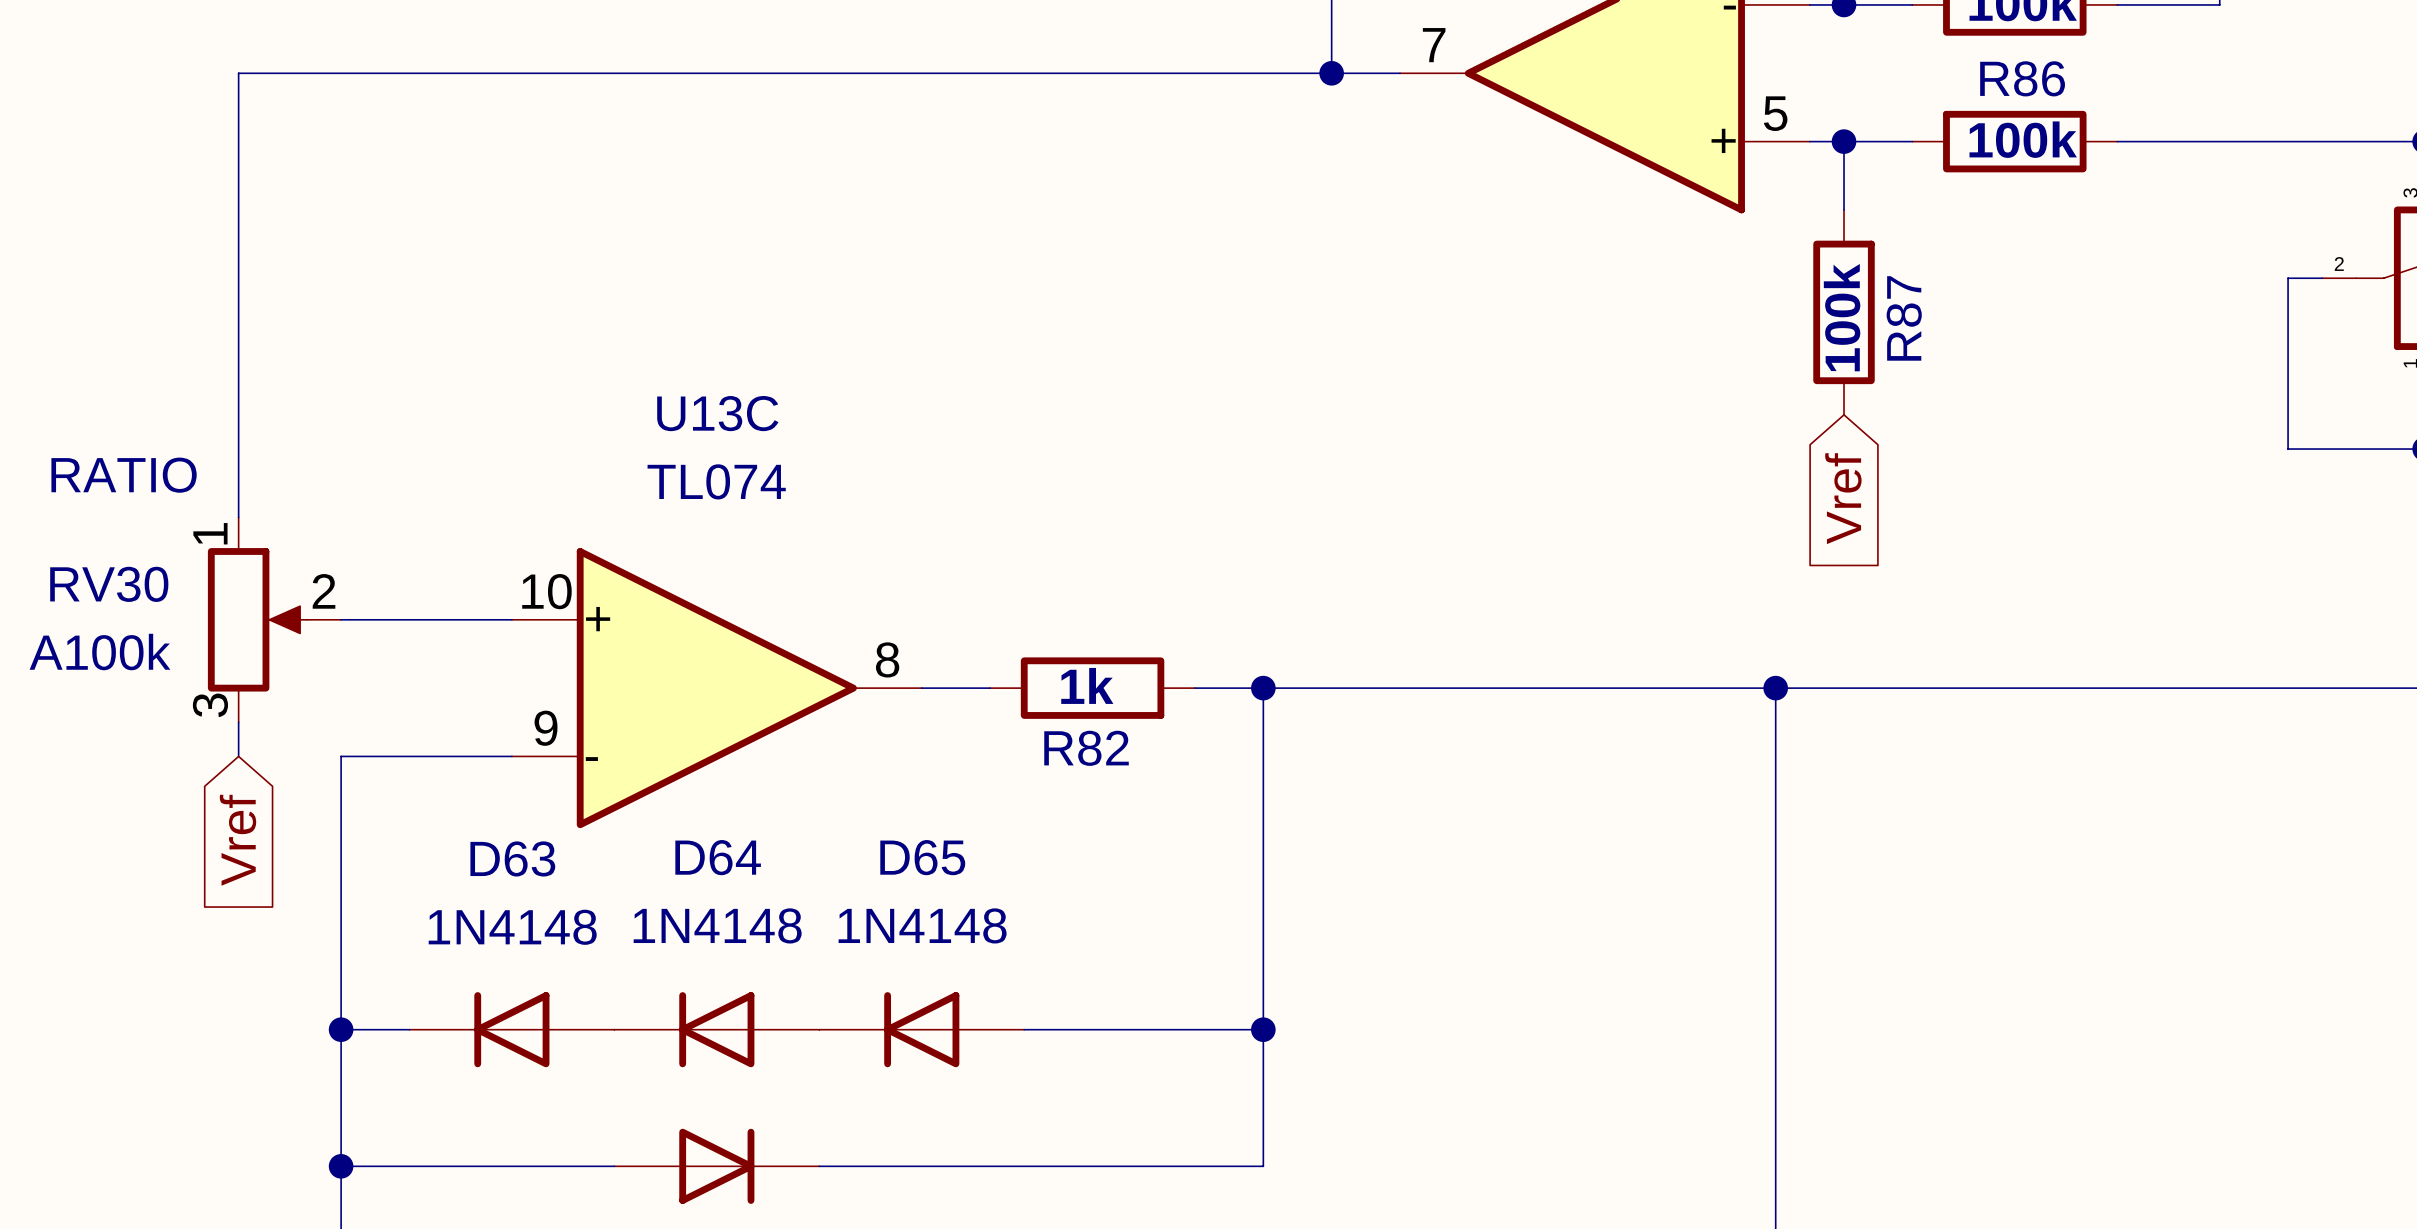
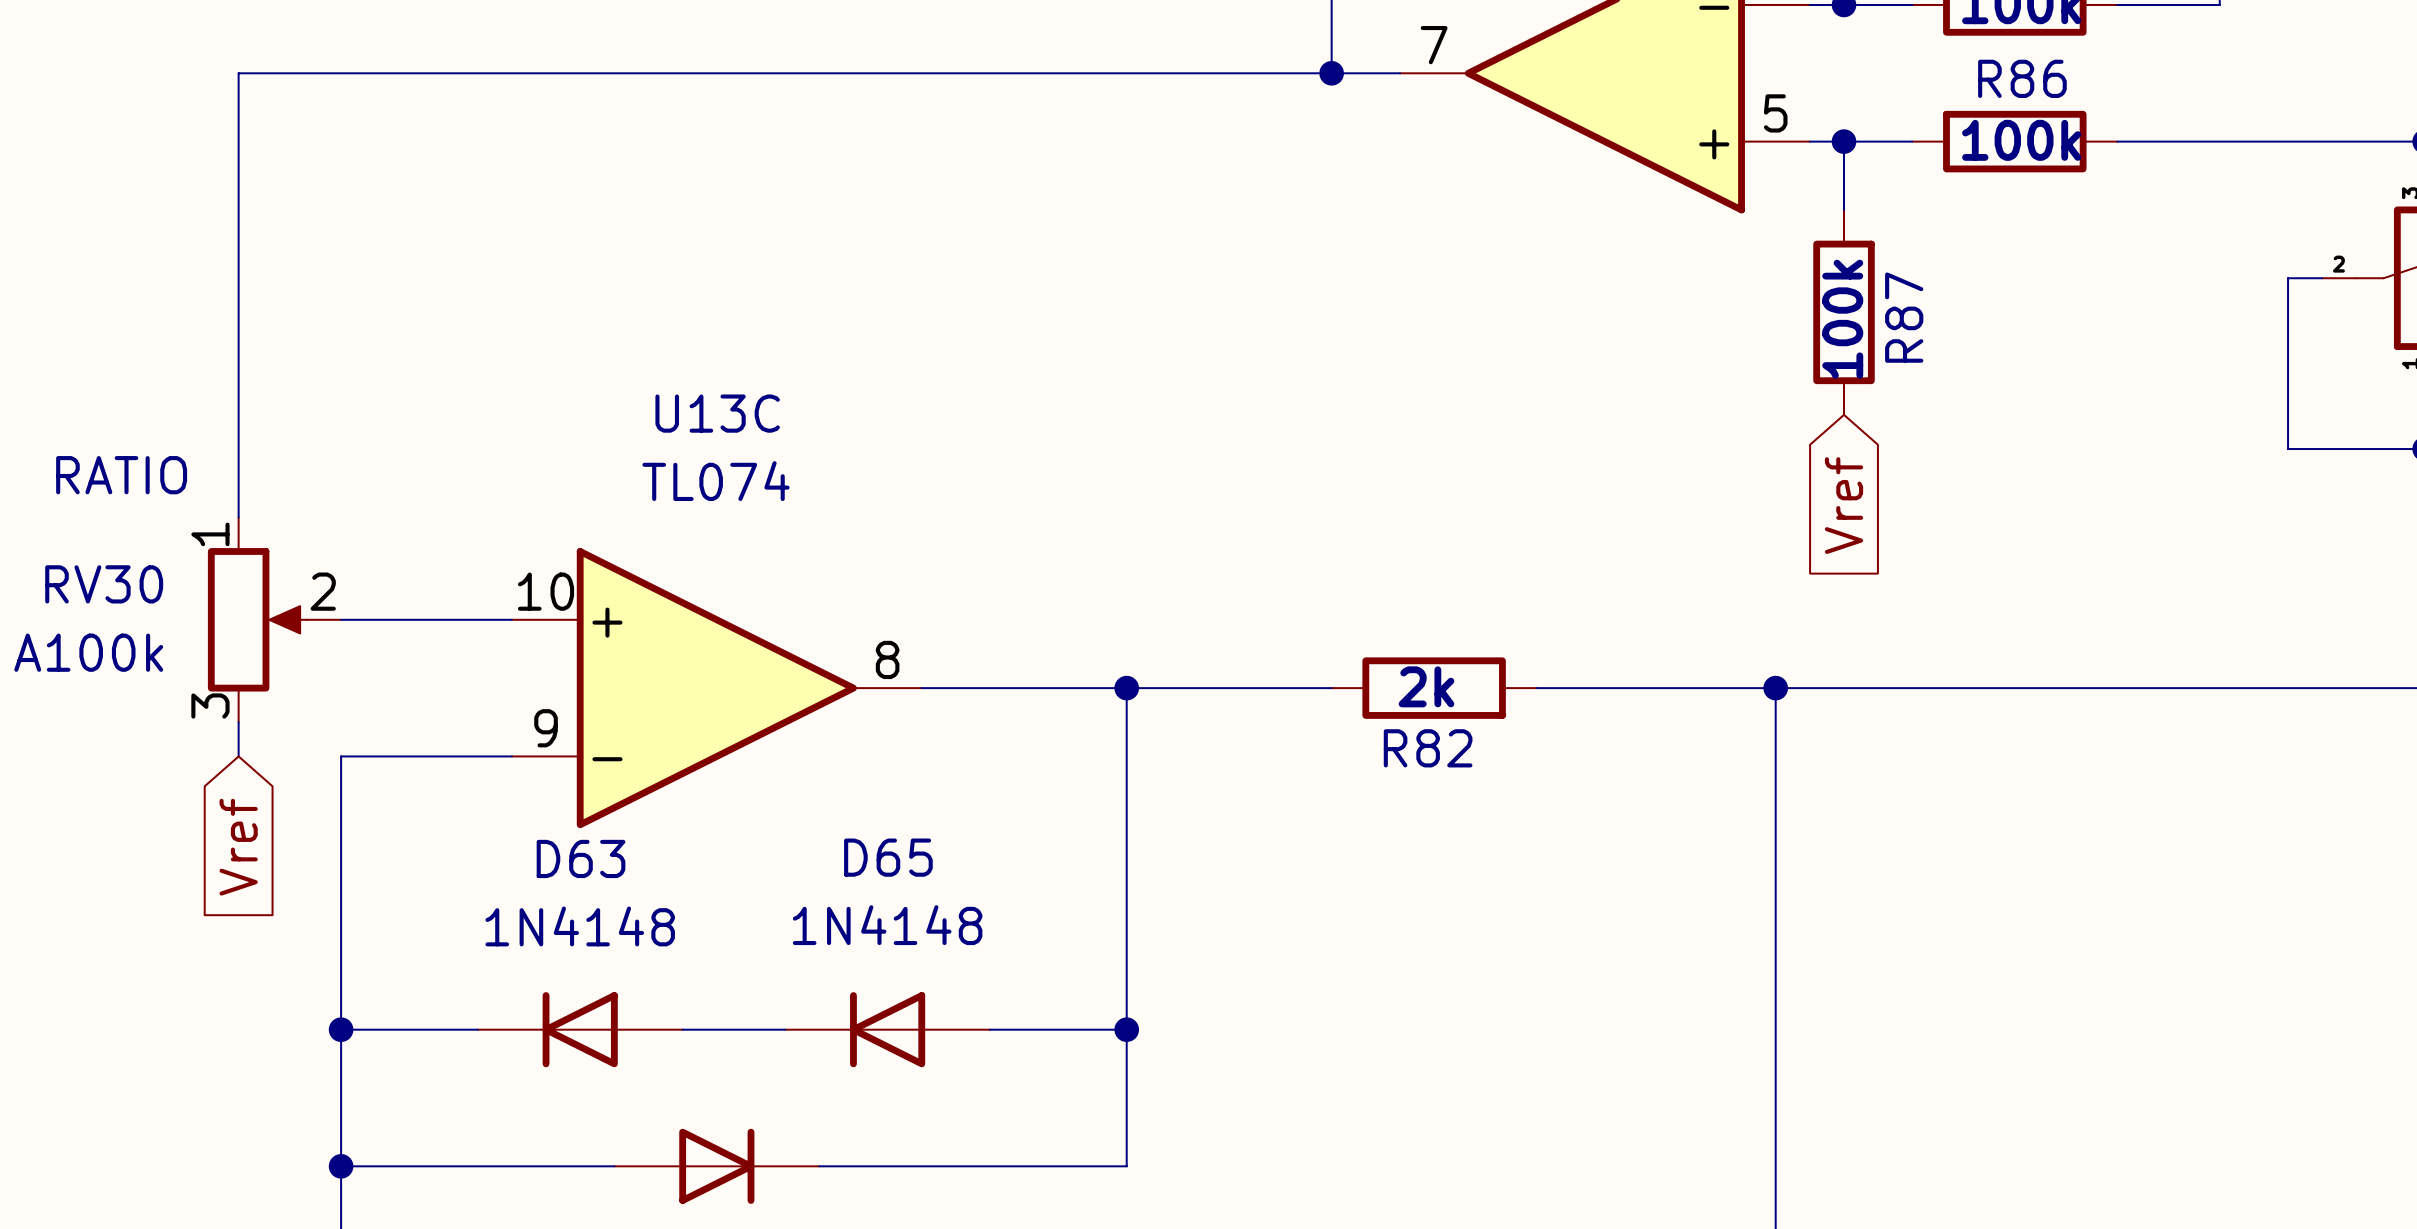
R82 value: 1k (1087, 685) -> 2k (1426, 686)
R82 position: (1092, 688) -> (1434, 688)
wire: (1263, 688) (1263, 1166) (1126, 1166) -> (1126, 688) (1126, 1166)
junction position: (1263, 688) -> (1126, 688)
wire: (1331, 688) (1536, 688) -> (990, 688) (1195, 688)
D63 position: (511, 1029) -> (580, 1029)
D64: 1N4148 (716, 1029) -> none
D65 position: (921, 1029) -> (887, 1029)
wire: (1126, 1029) (1263, 1029) -> none
junction position: (1263, 1029) -> (1126, 1029)

